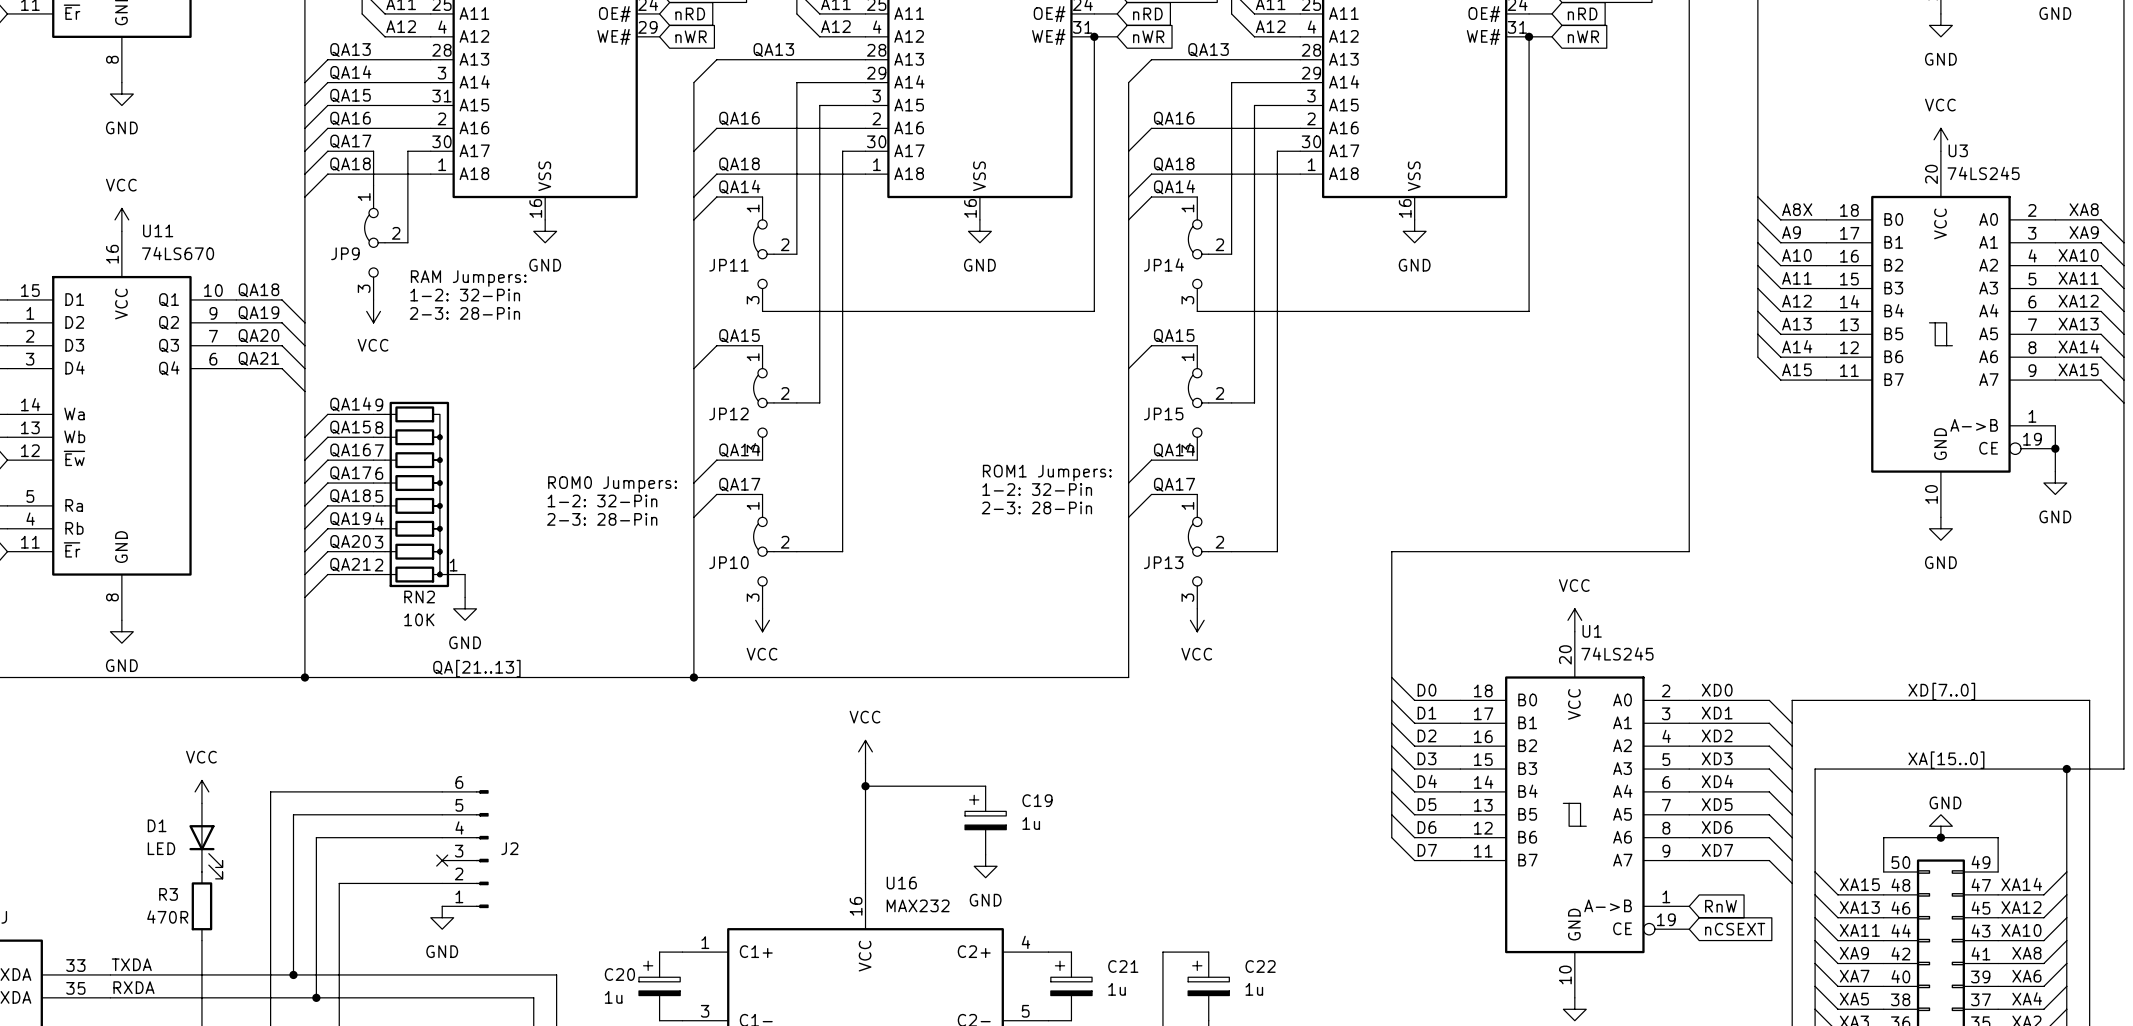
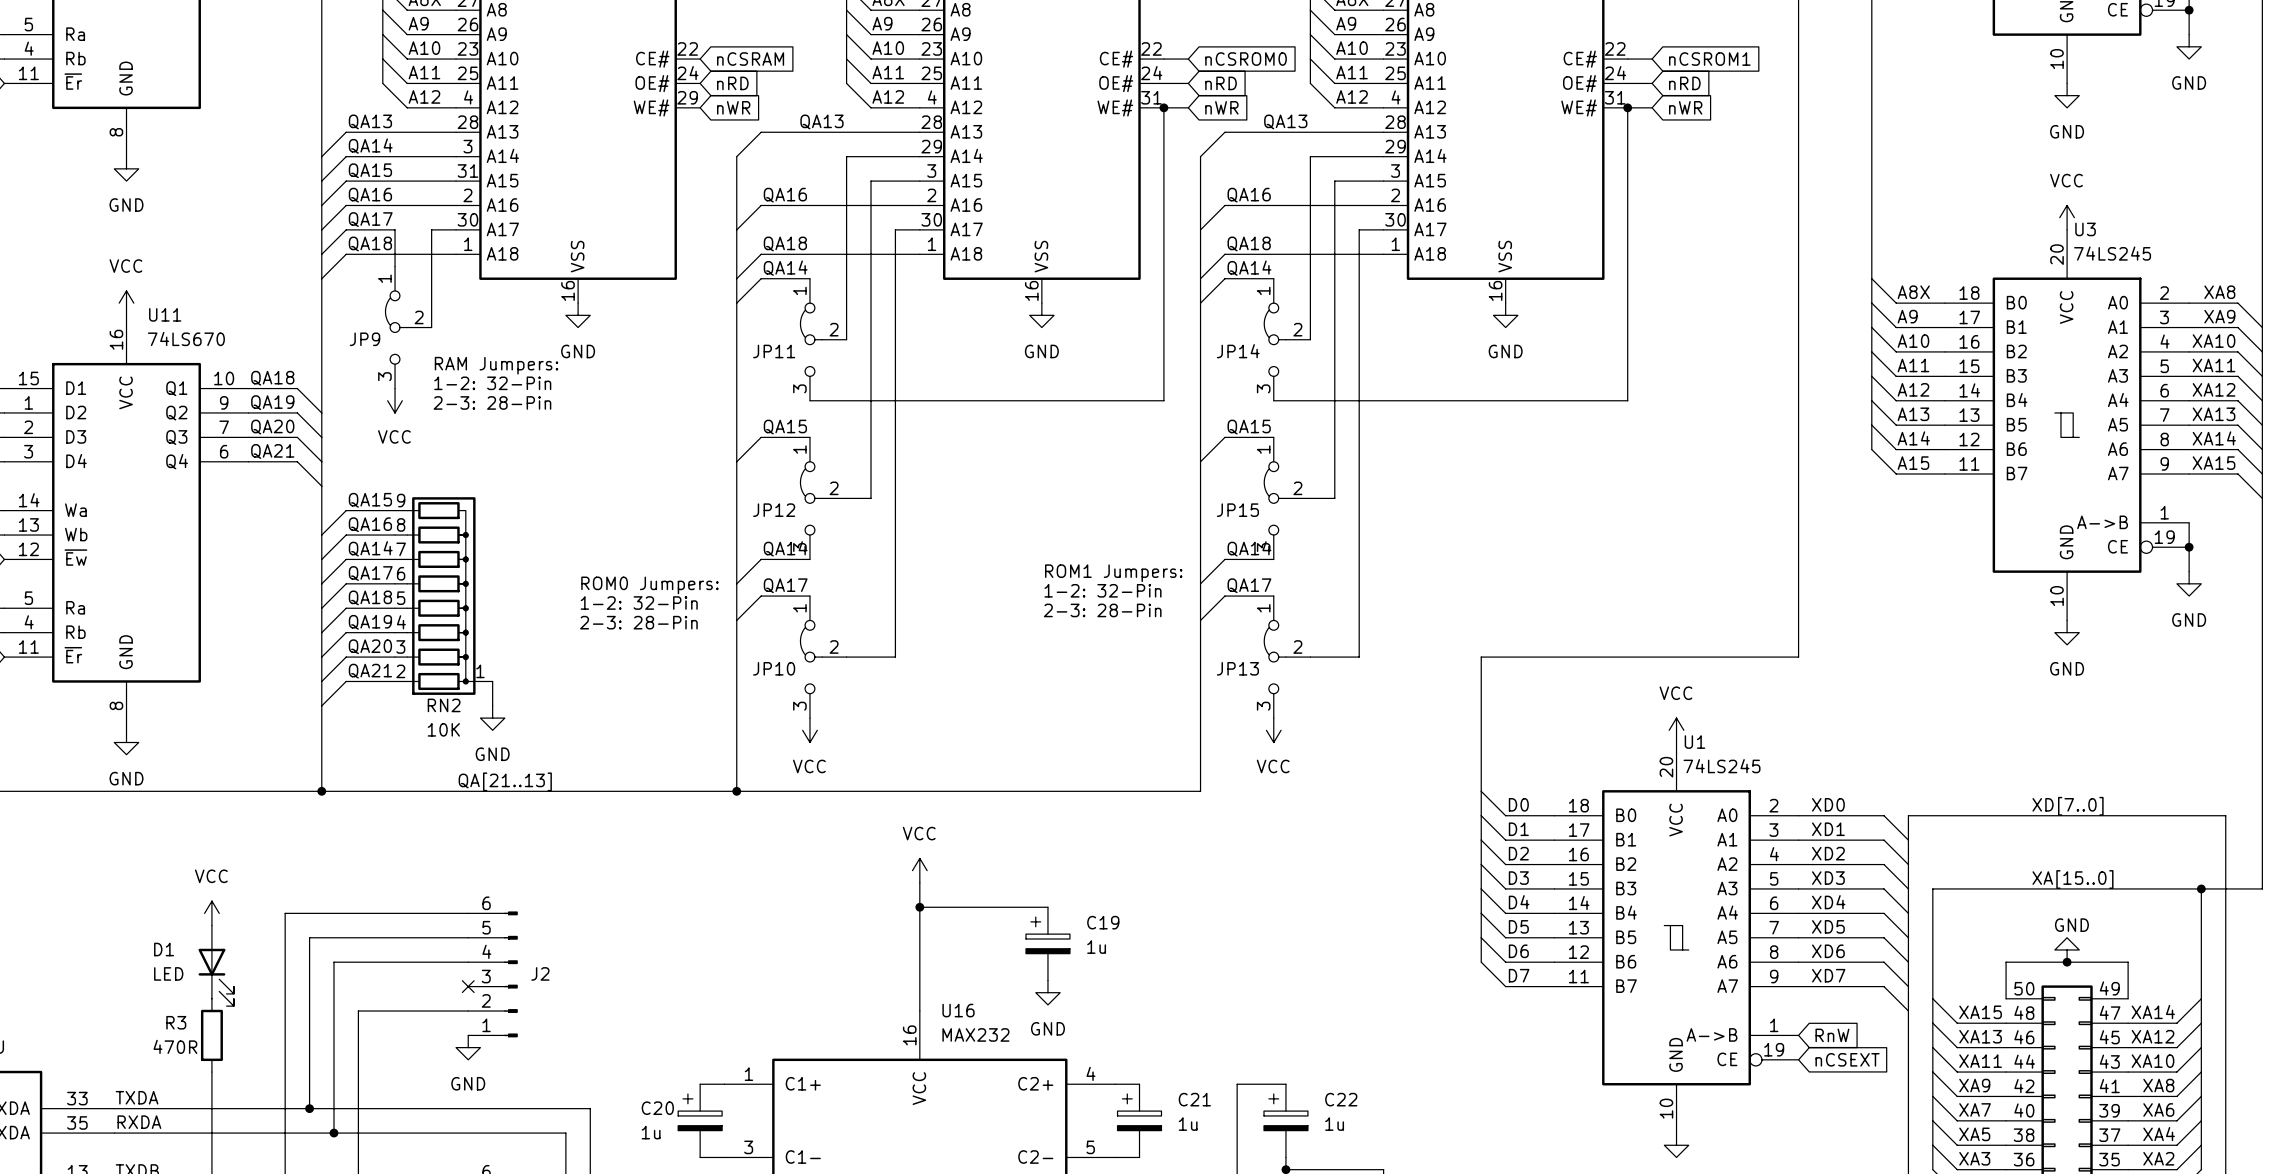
label: QA14 (350, 404) -> QA15 (370, 500)
label: QA15 (350, 427) -> QA16 (370, 524)
label: QA16 (350, 450) -> QA14 (370, 548)

